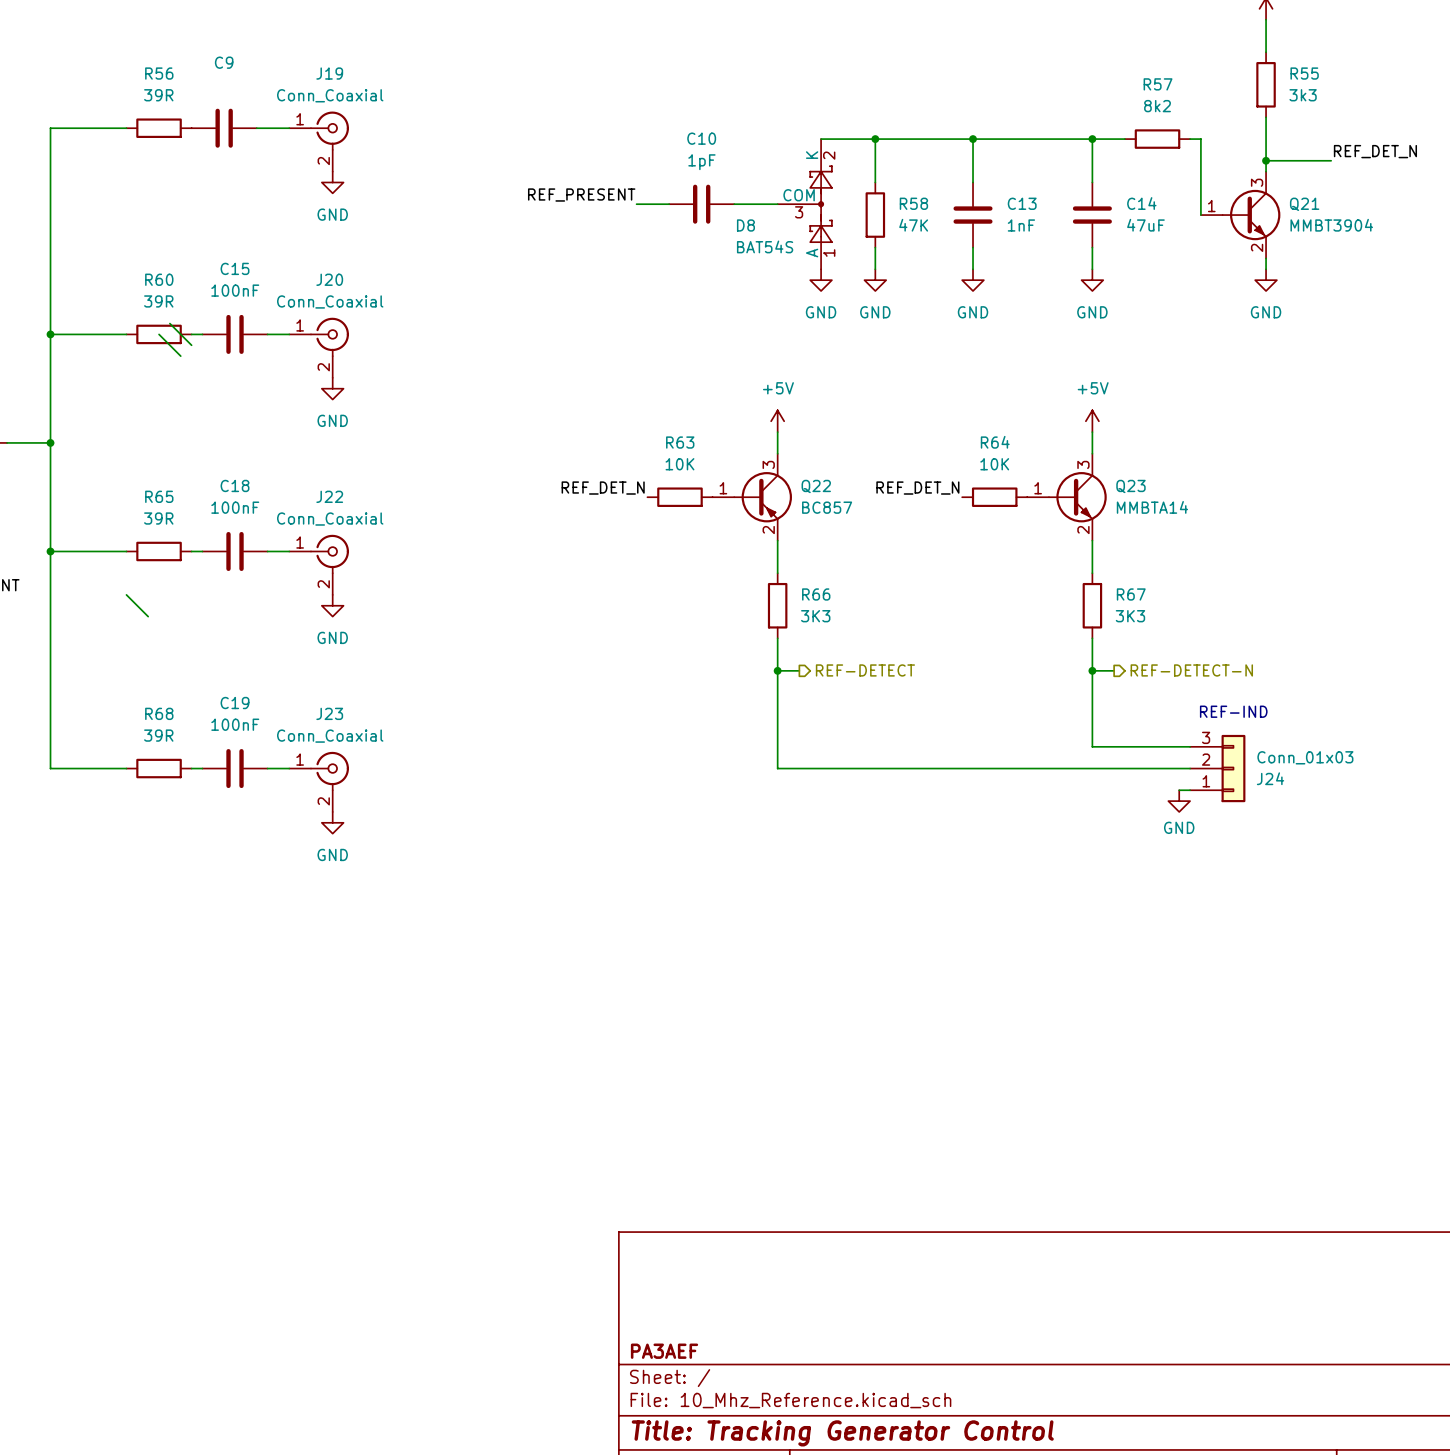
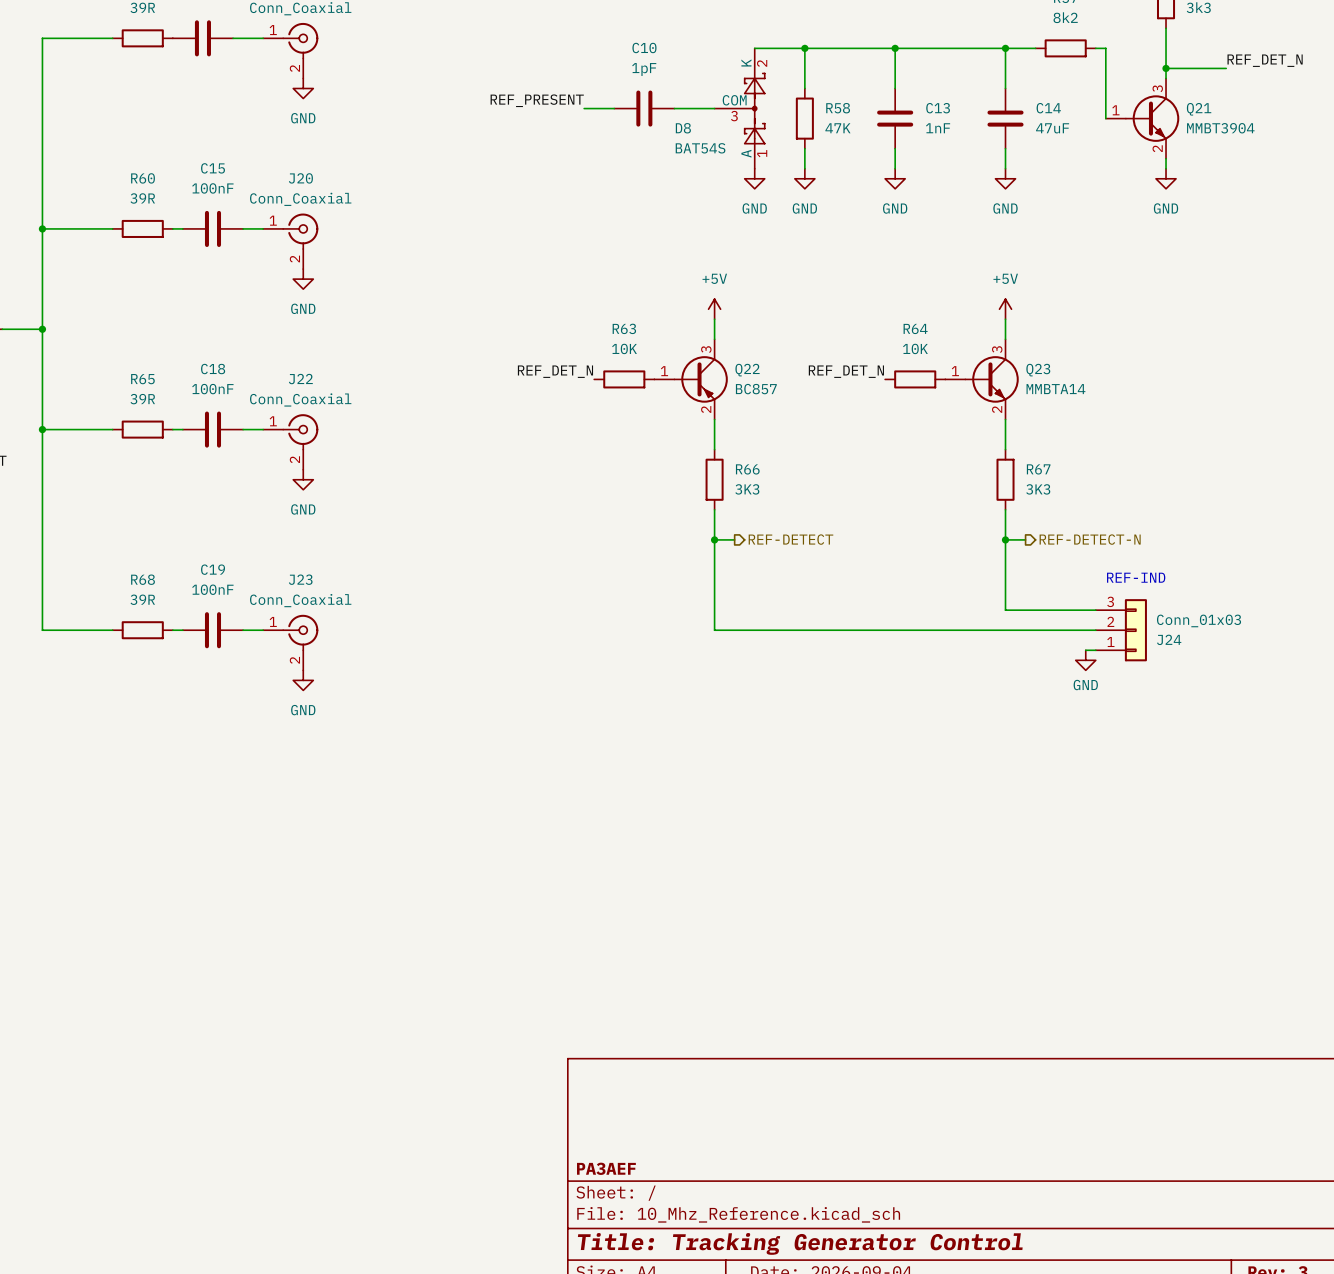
wire: (169, 323) (191, 345) -> none
wire: (159, 334) (180, 356) -> none
wire: (126, 594) (148, 616) -> none

